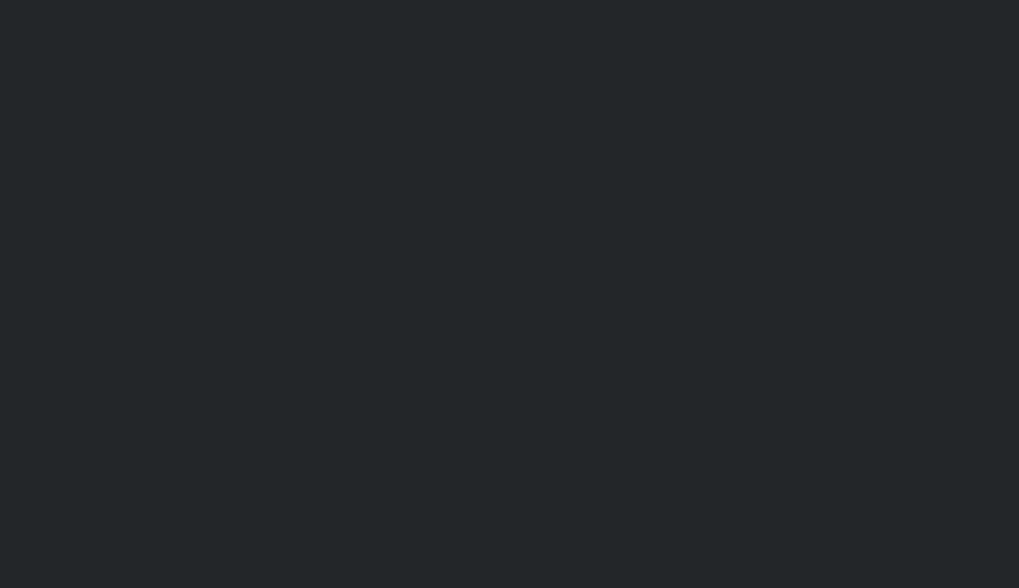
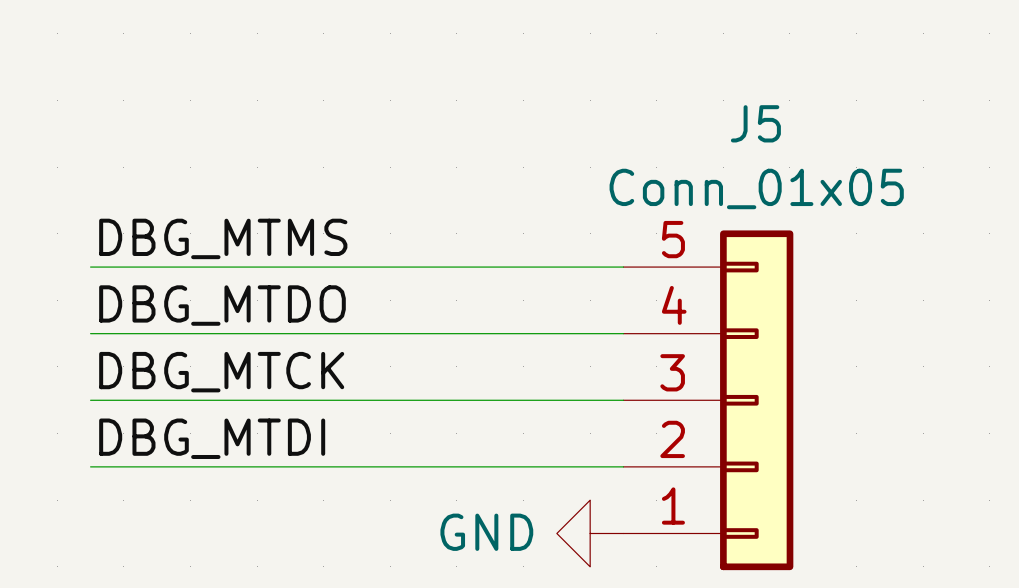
label: none -> DBG_MTMS (223, 238)
wire: none -> (90, 267) (623, 267)
label: none -> DBG_MTDO (222, 305)
wire: none -> (90, 333) (623, 333)
label: none -> DBG_MTCK (221, 372)
wire: none -> (90, 400) (623, 400)
J5: none -> Conn_01x05 (708, 400)
label: none -> DBG_MTDI (212, 438)
wire: none -> (90, 466) (623, 466)
power symbol: none -> GND (590, 533)

